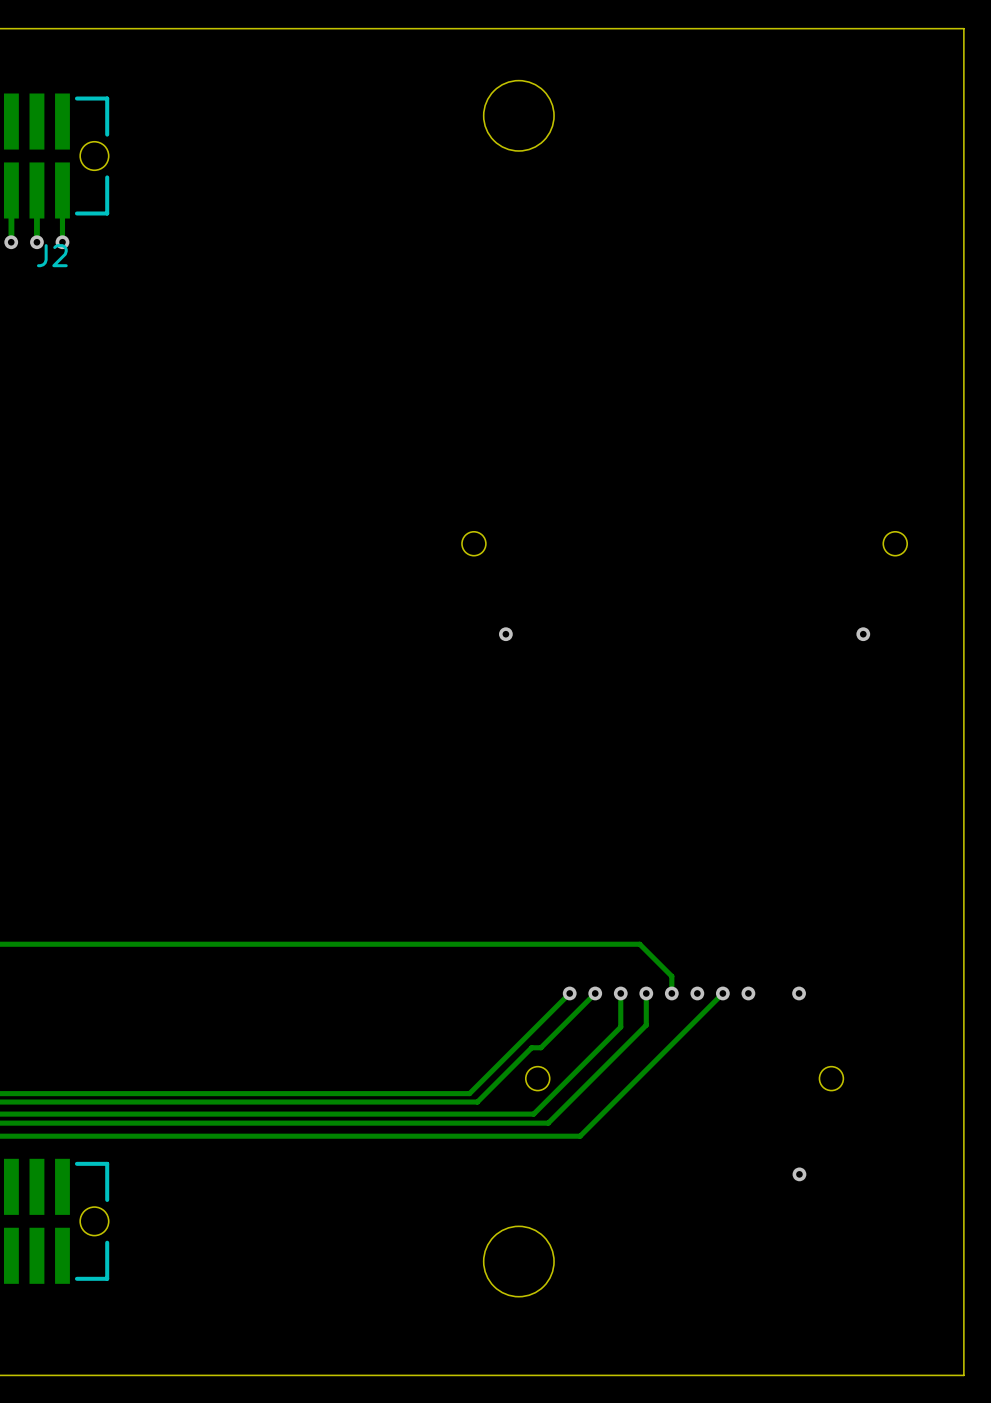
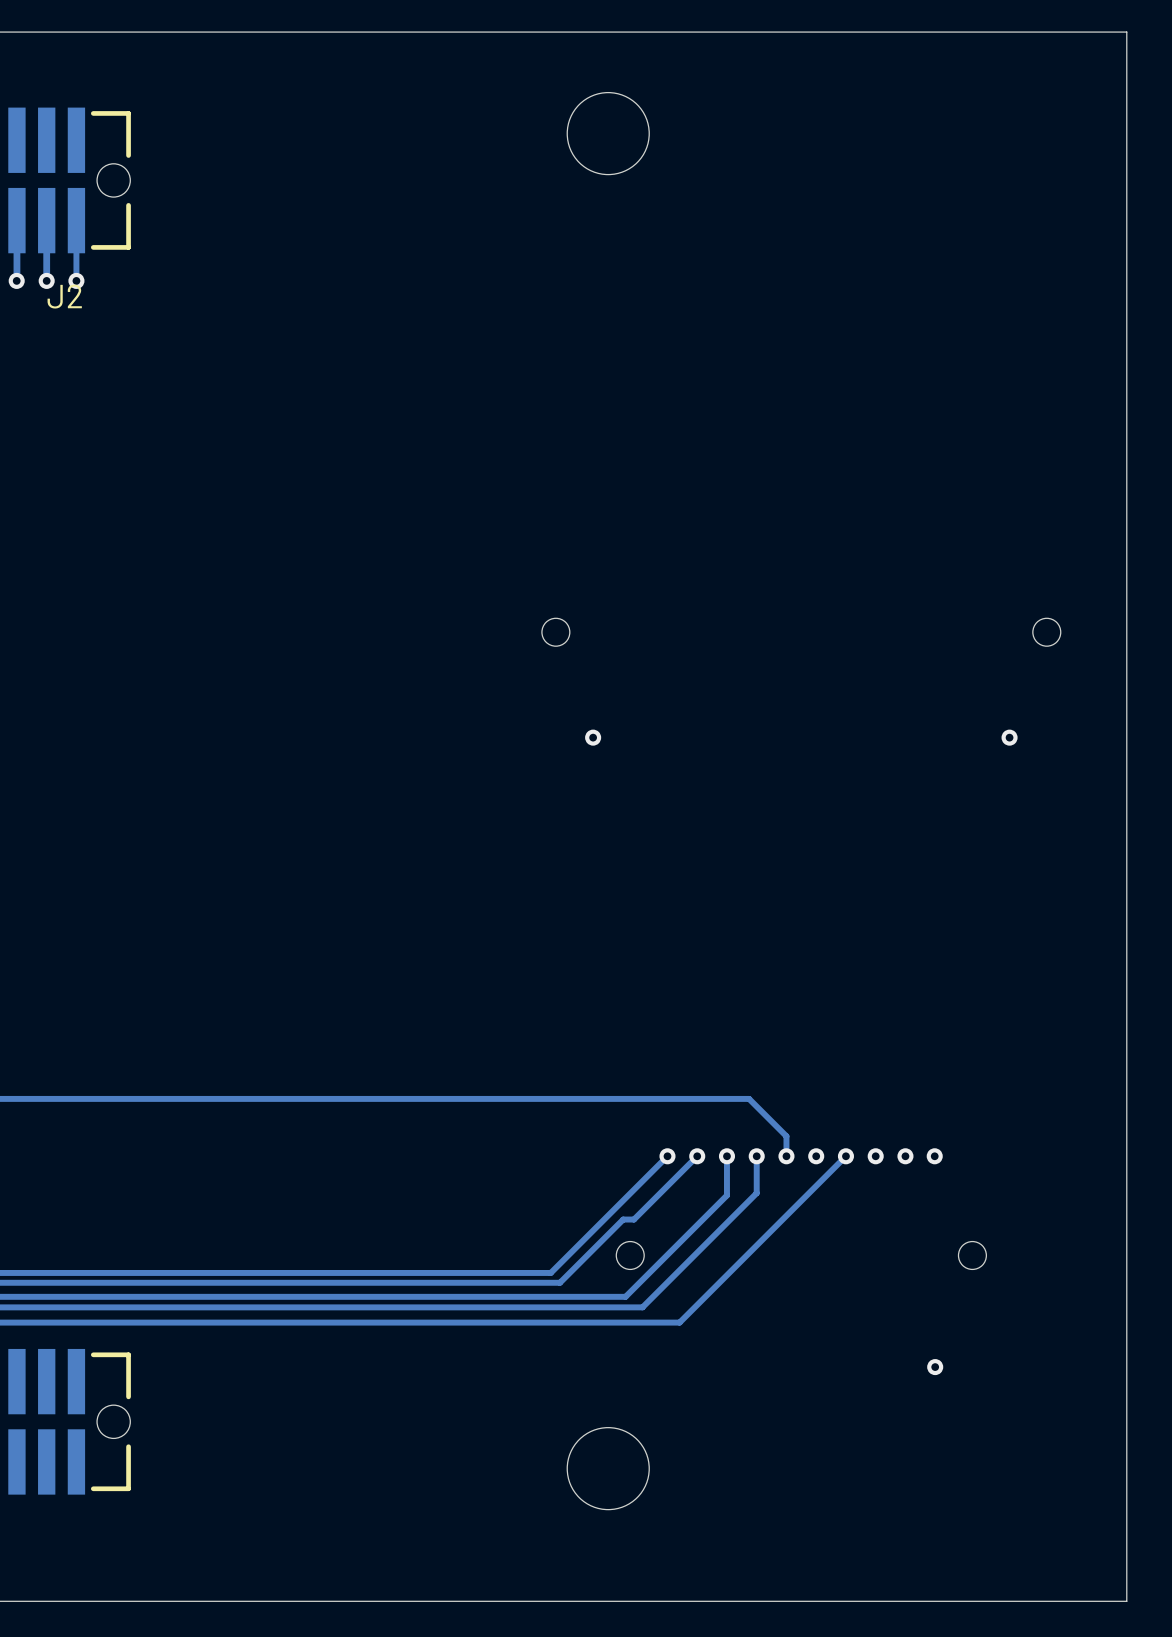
via: none -> (905, 1156)

